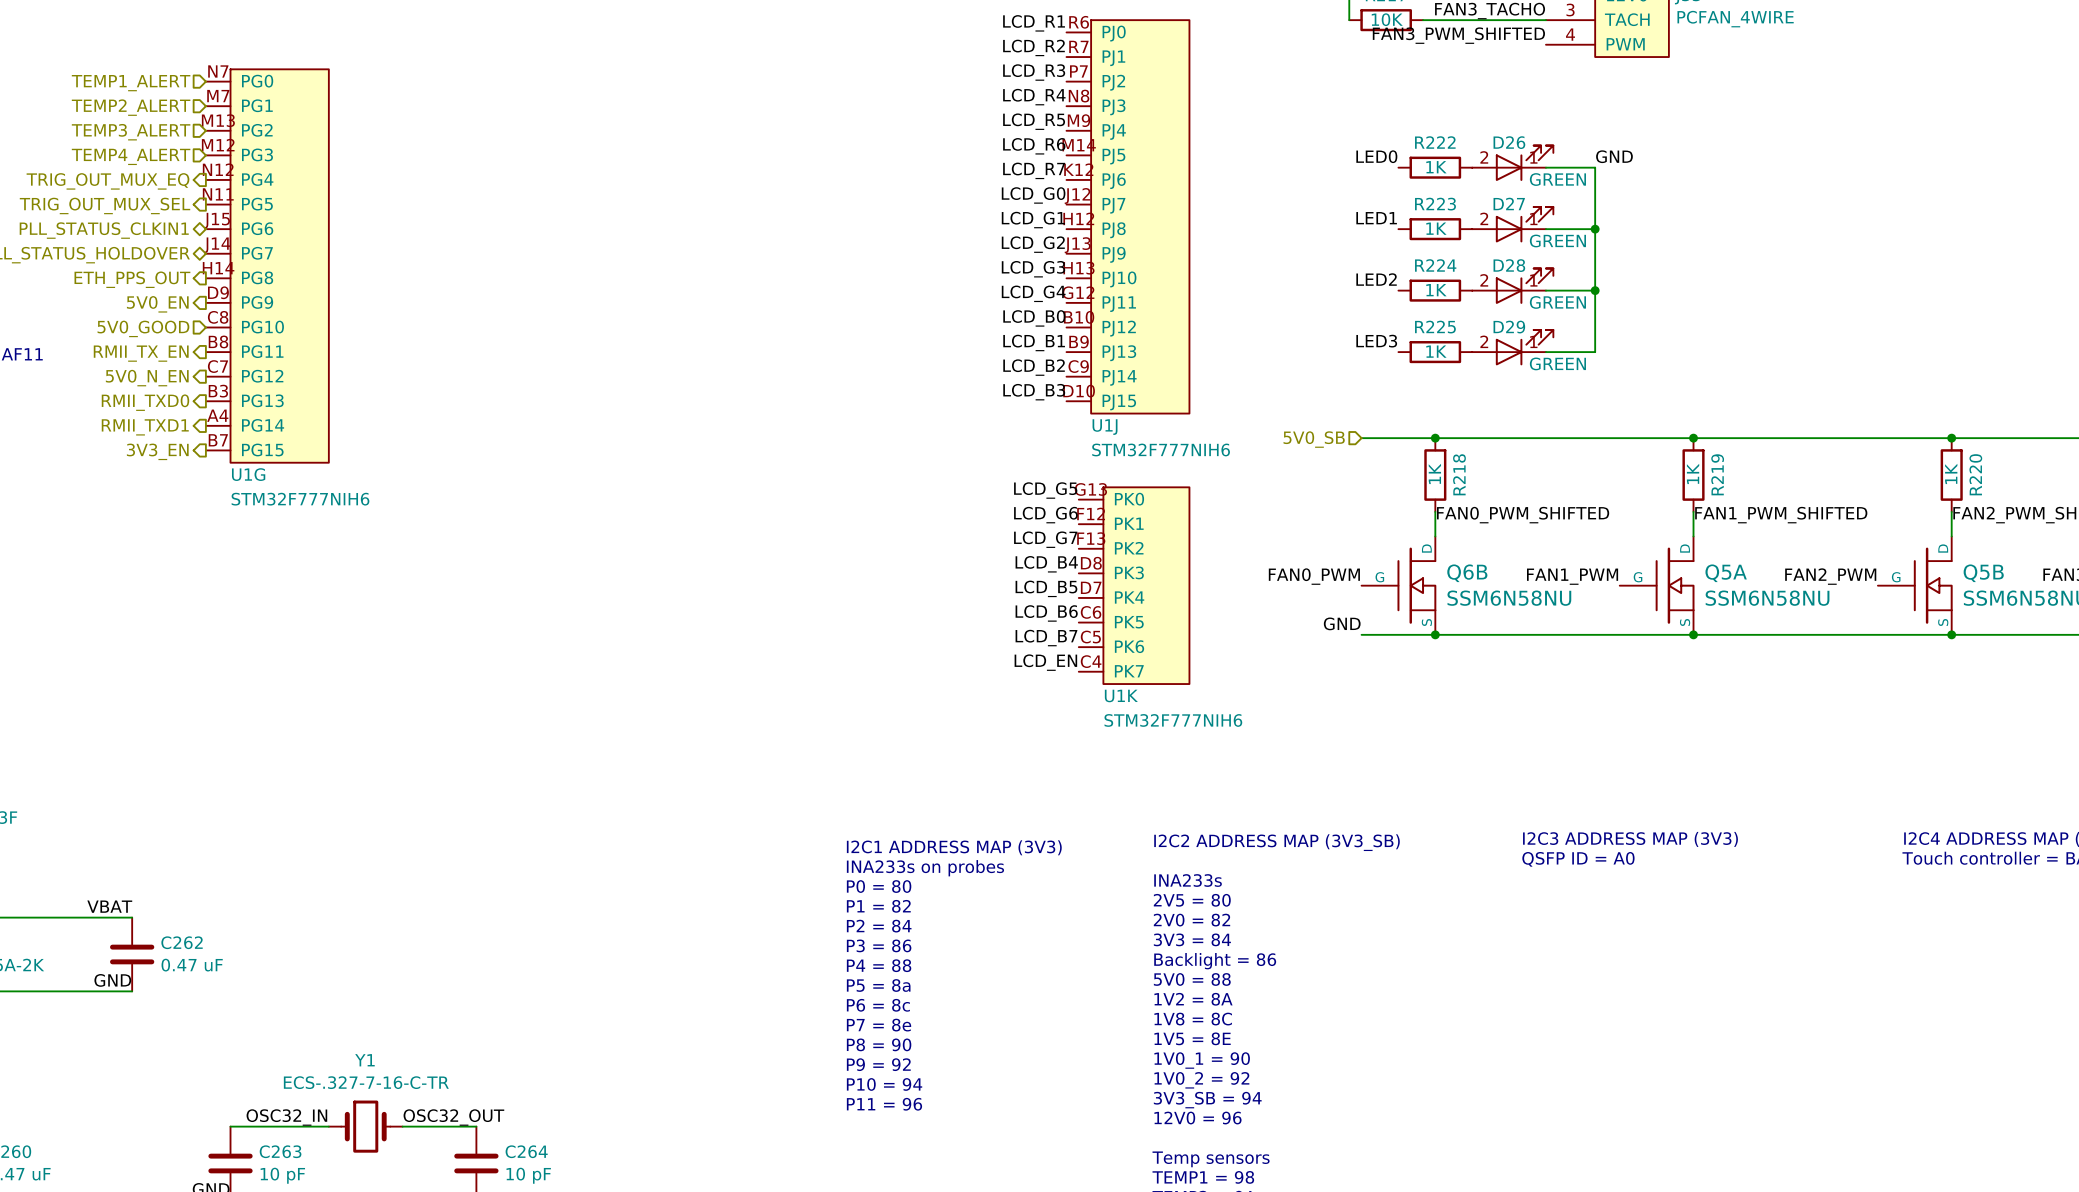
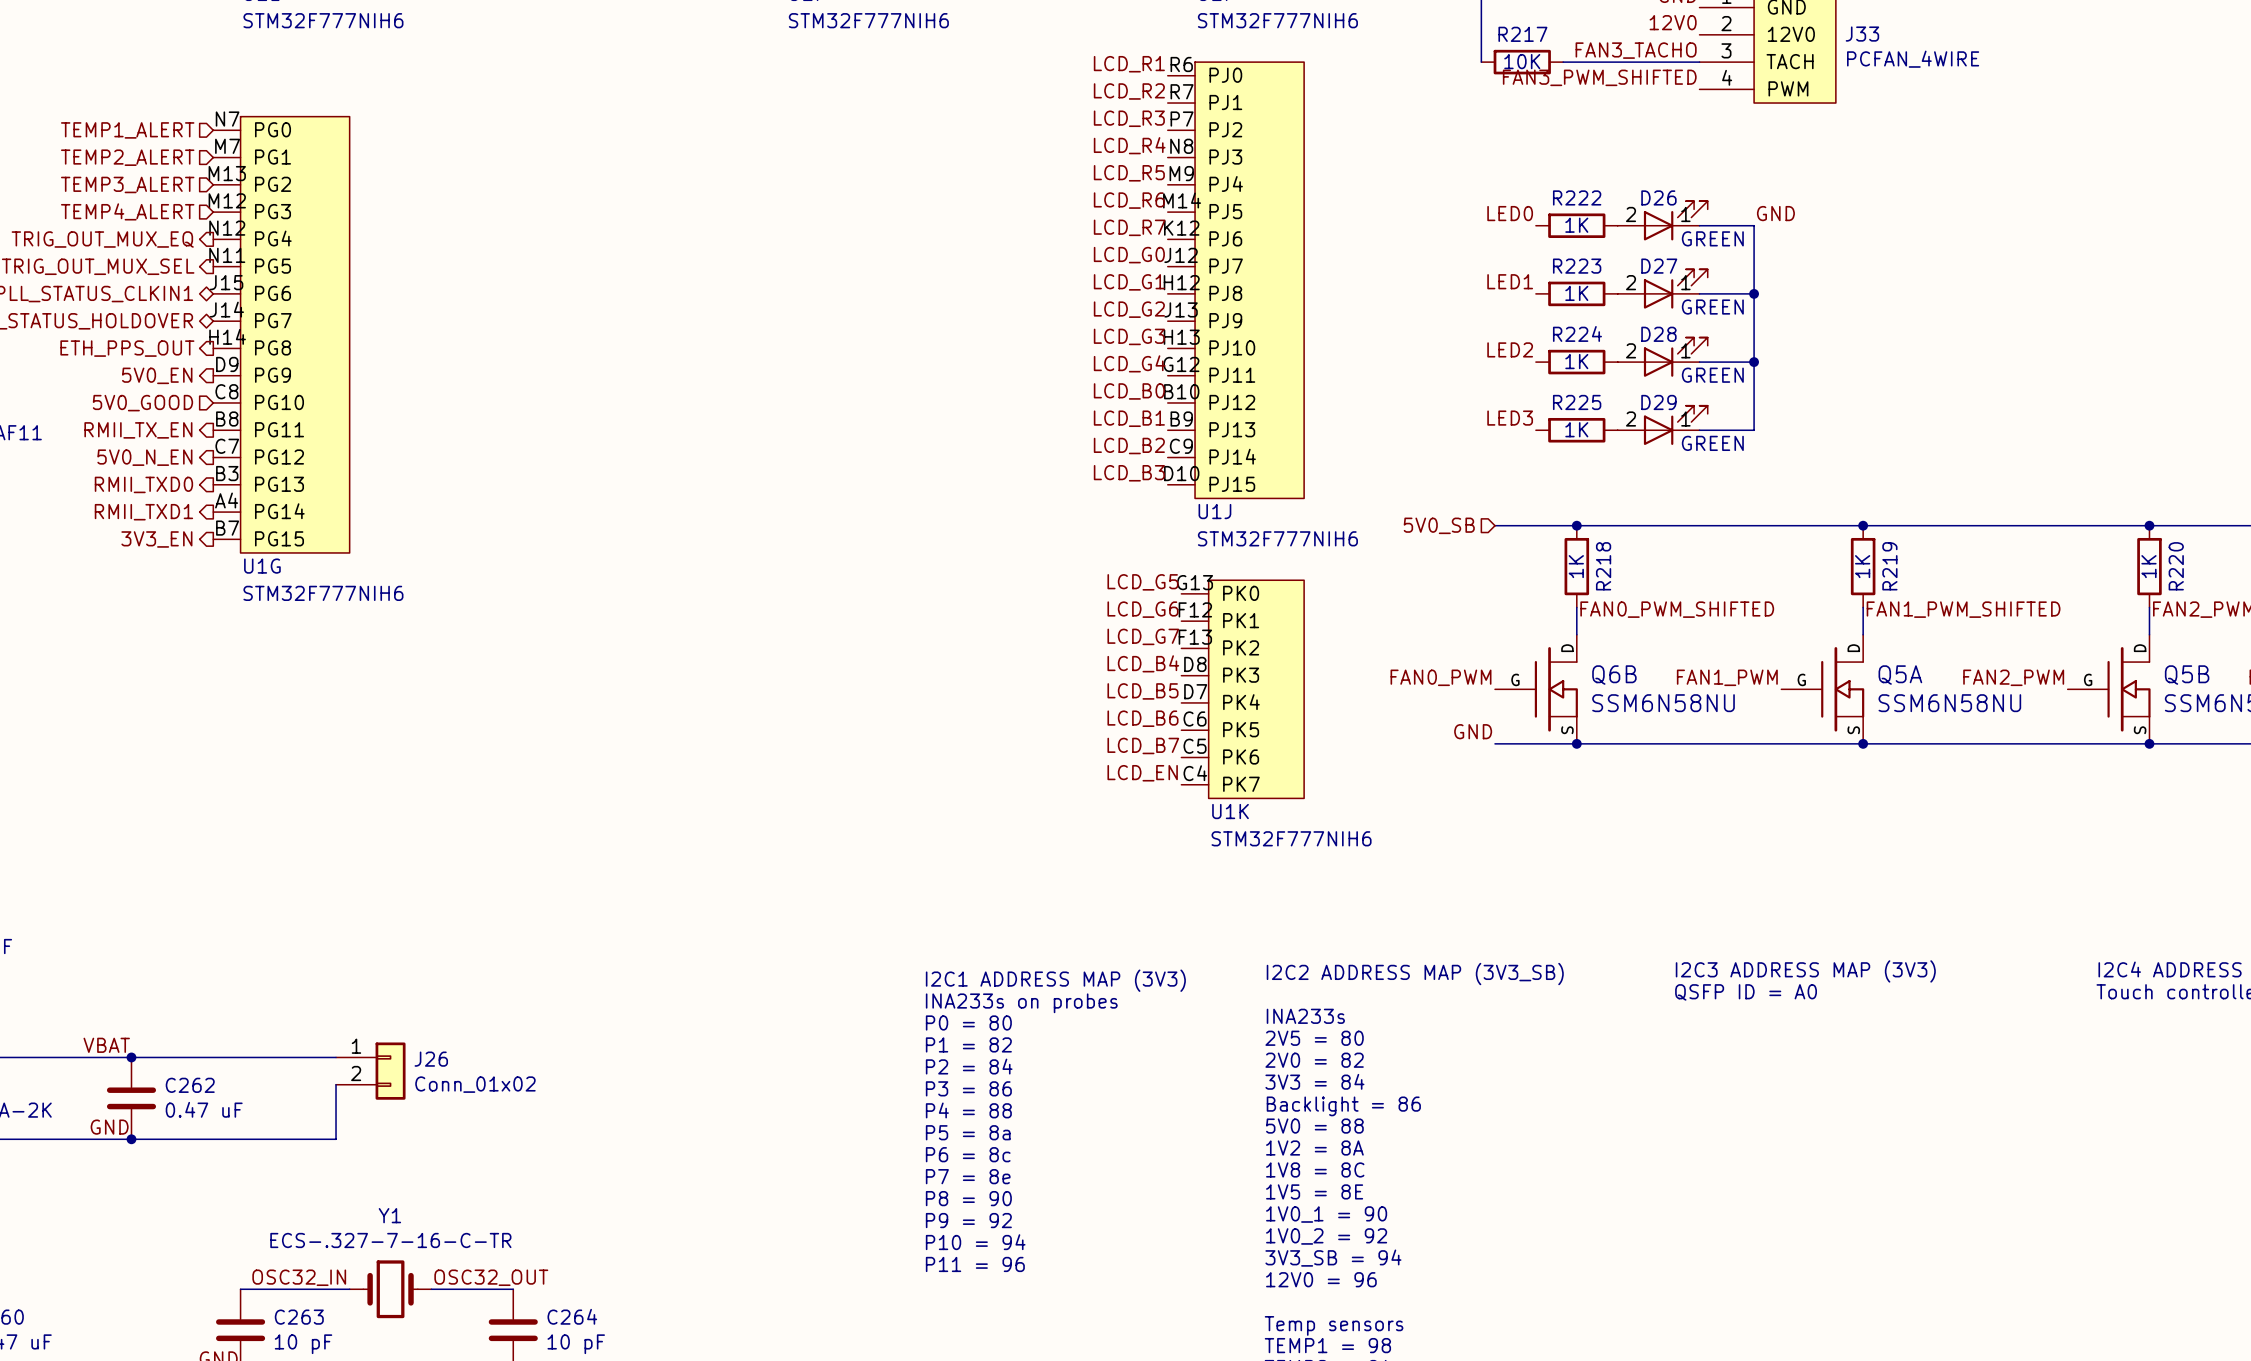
wire: none -> (131, 1057) (336, 1057)
junction: none -> (131, 1057)
J26: none -> Conn_01x02 (370, 1071)
wire: none -> (336, 1084) (336, 1139) (131, 1139)
junction: none -> (131, 1139)

